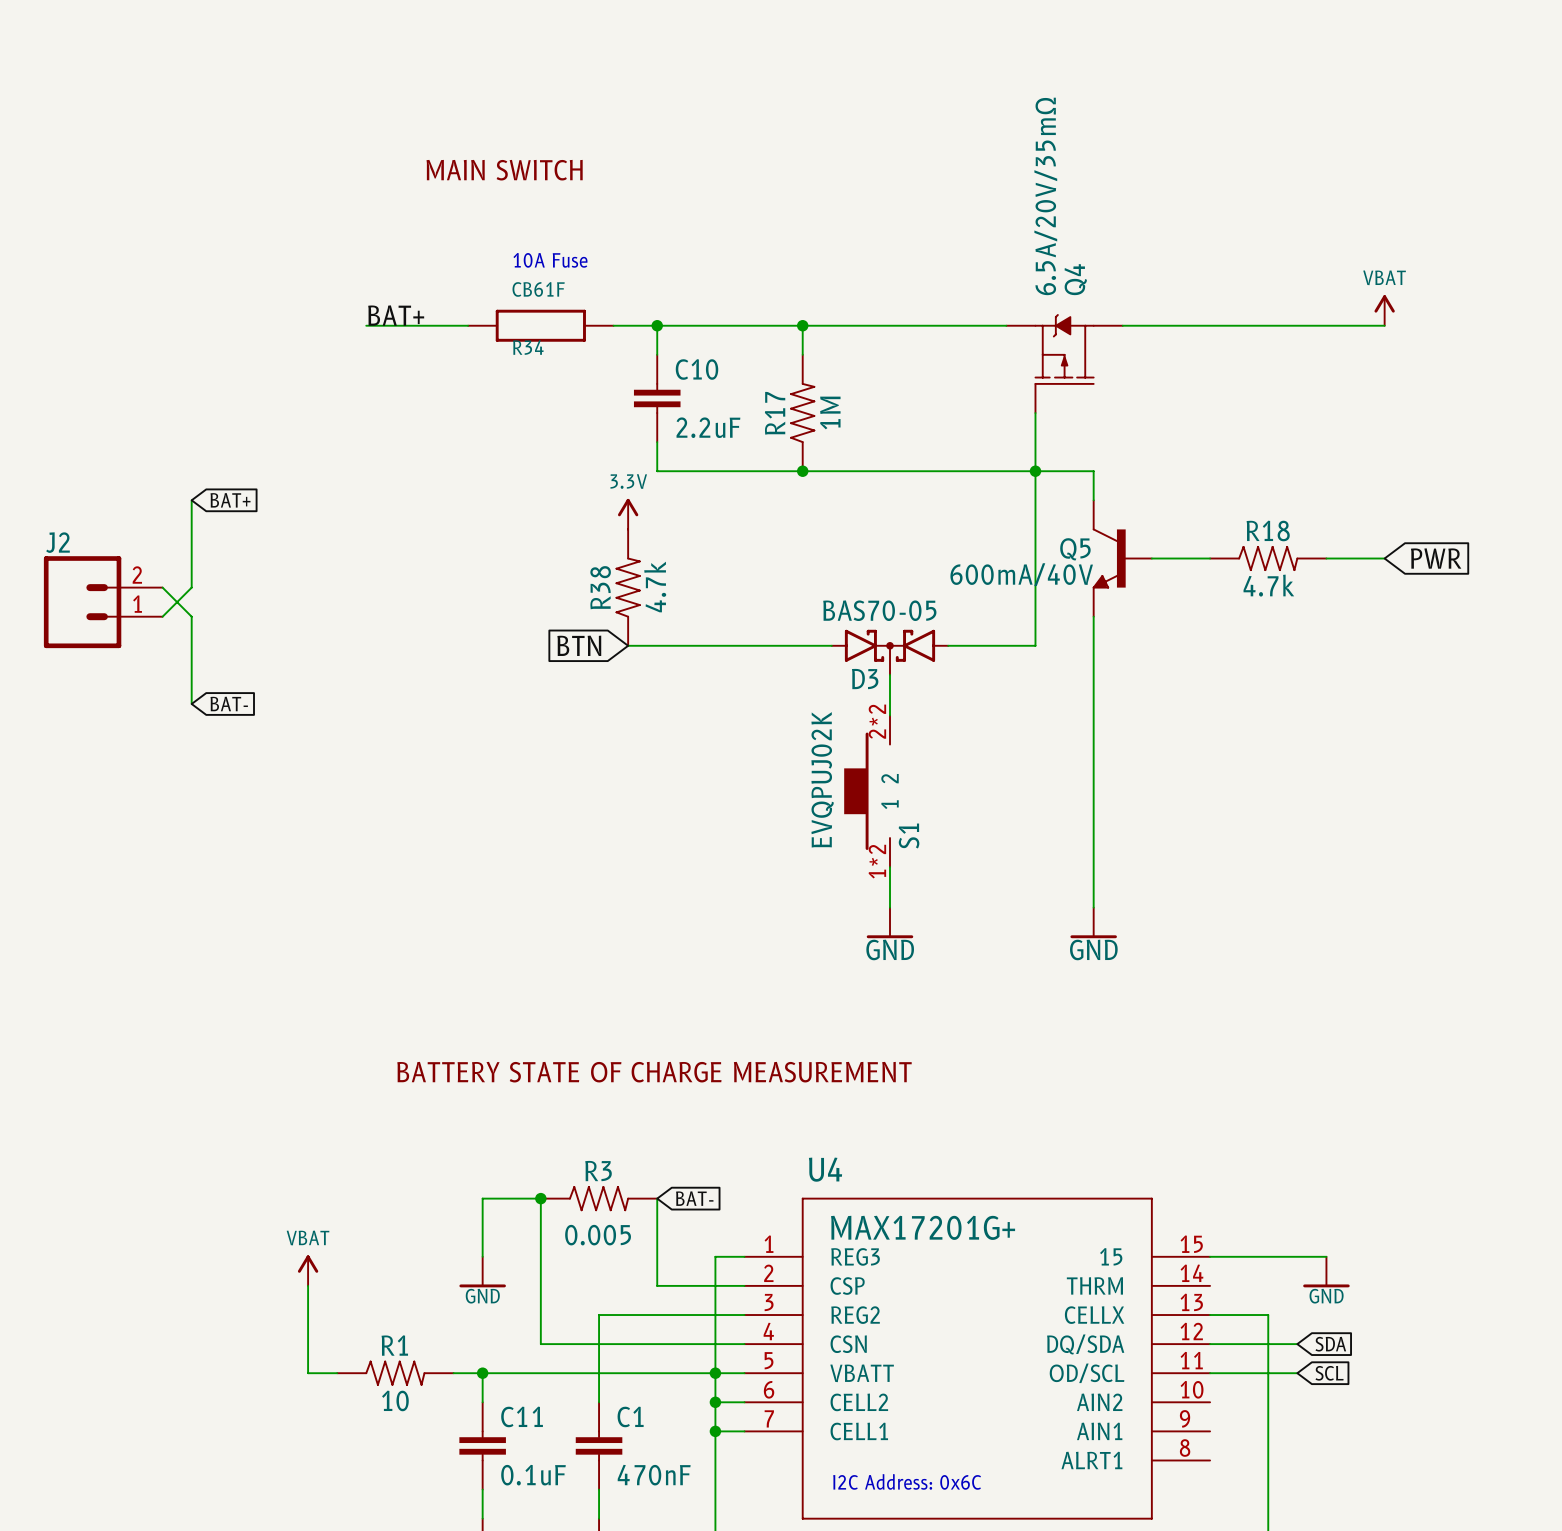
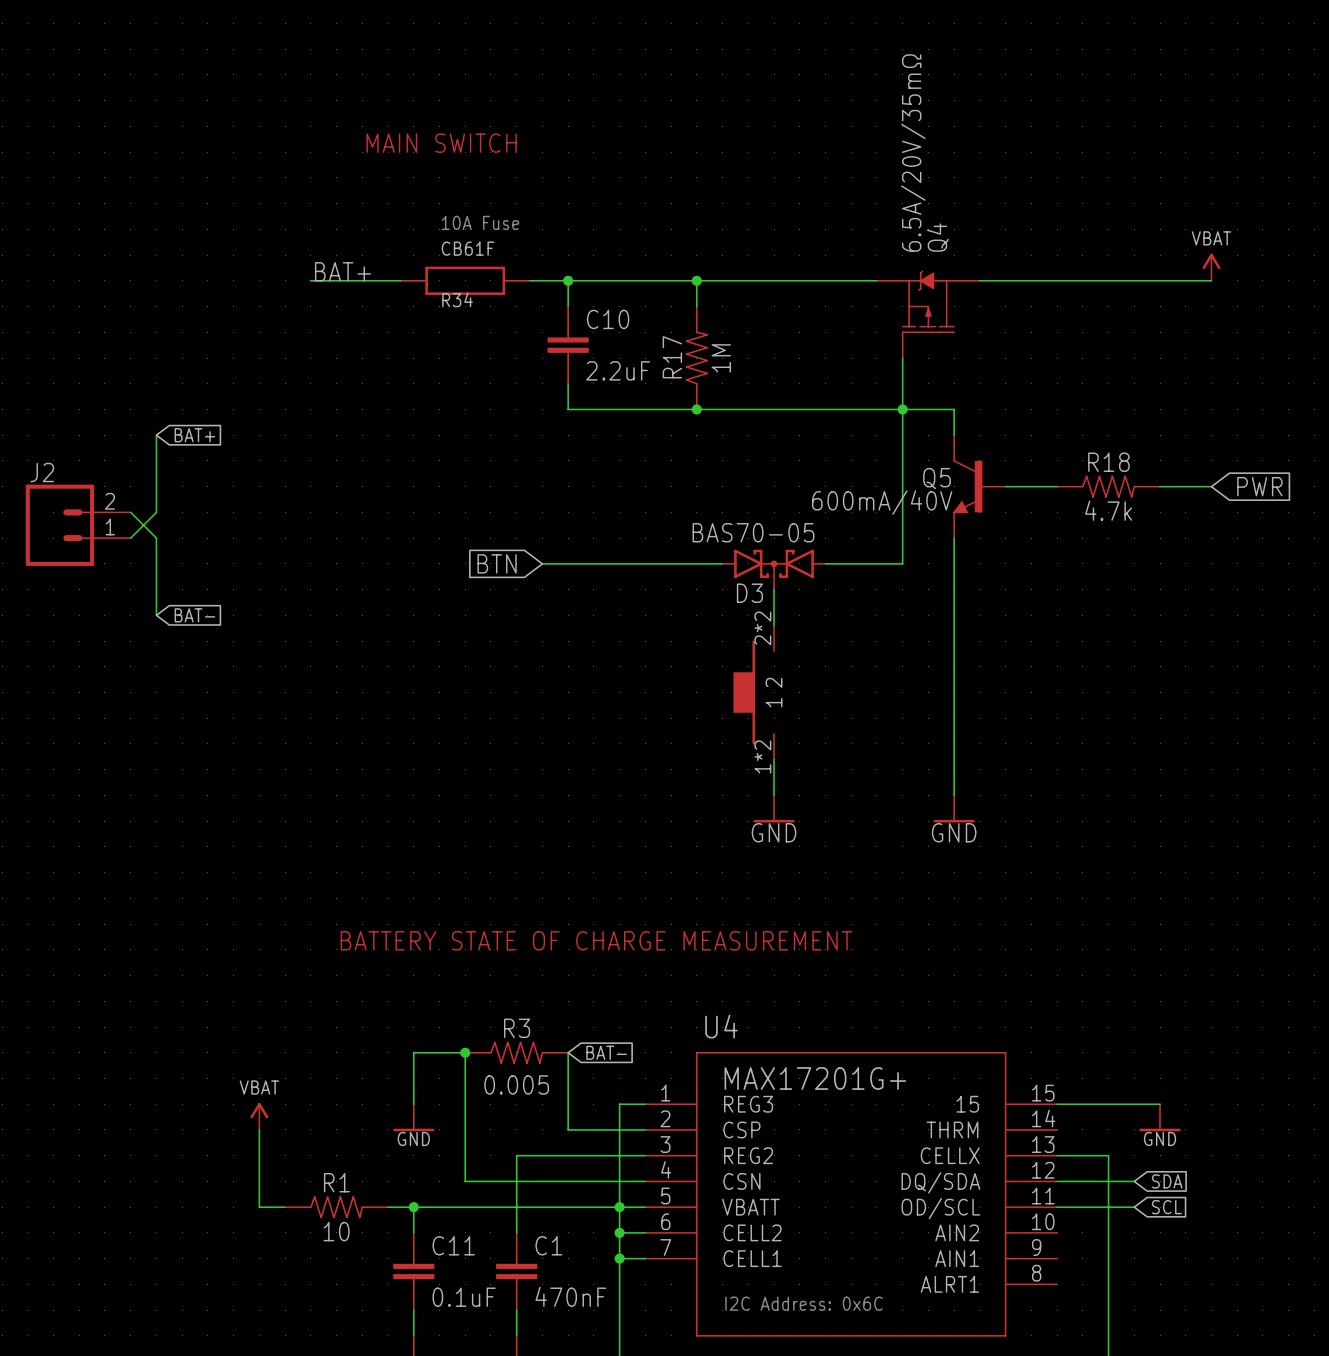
power symbol: 3.3V (628, 514) -> none
R38: 4.7k (628, 587) -> none
S1 value: EVQPUJ02K (822, 779) -> none
S1 name: S1 (909, 836) -> none

